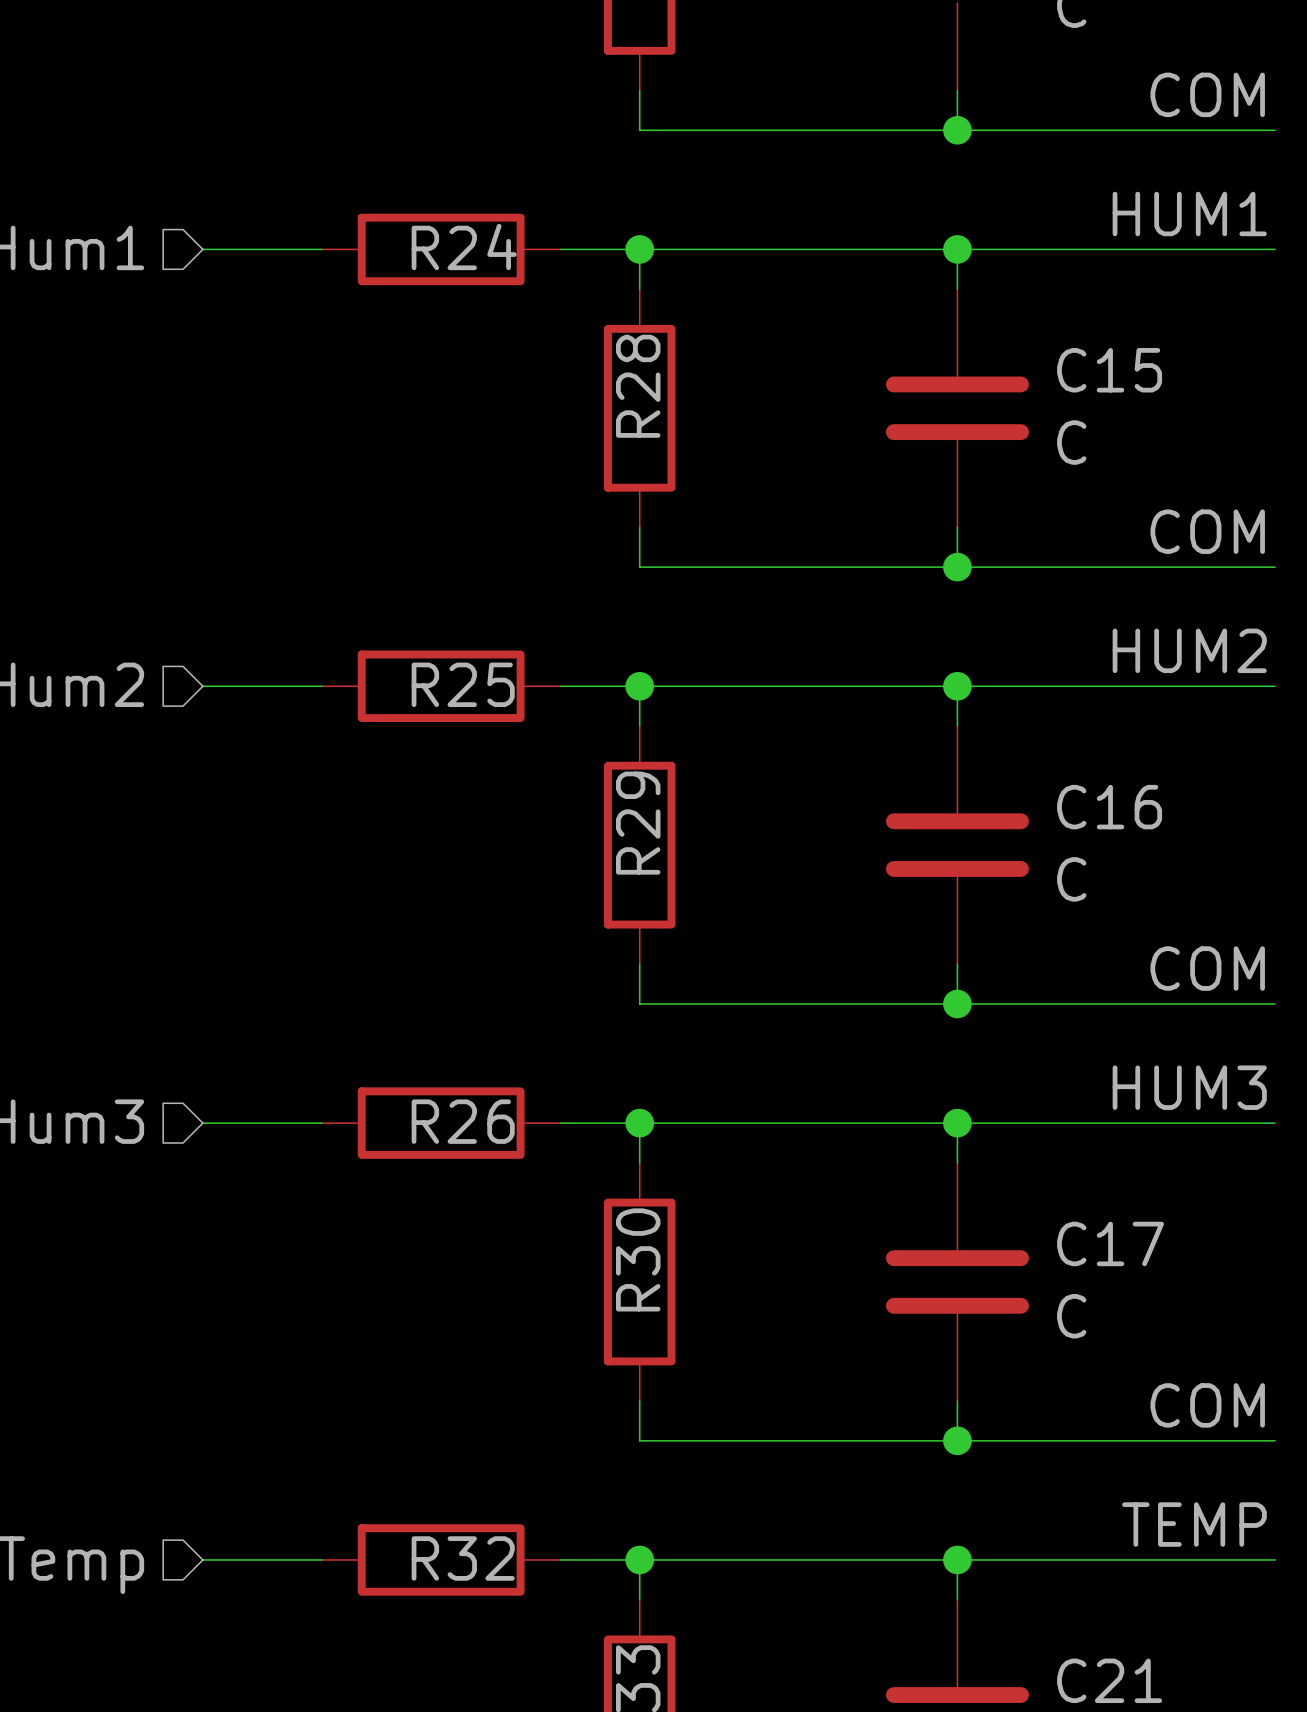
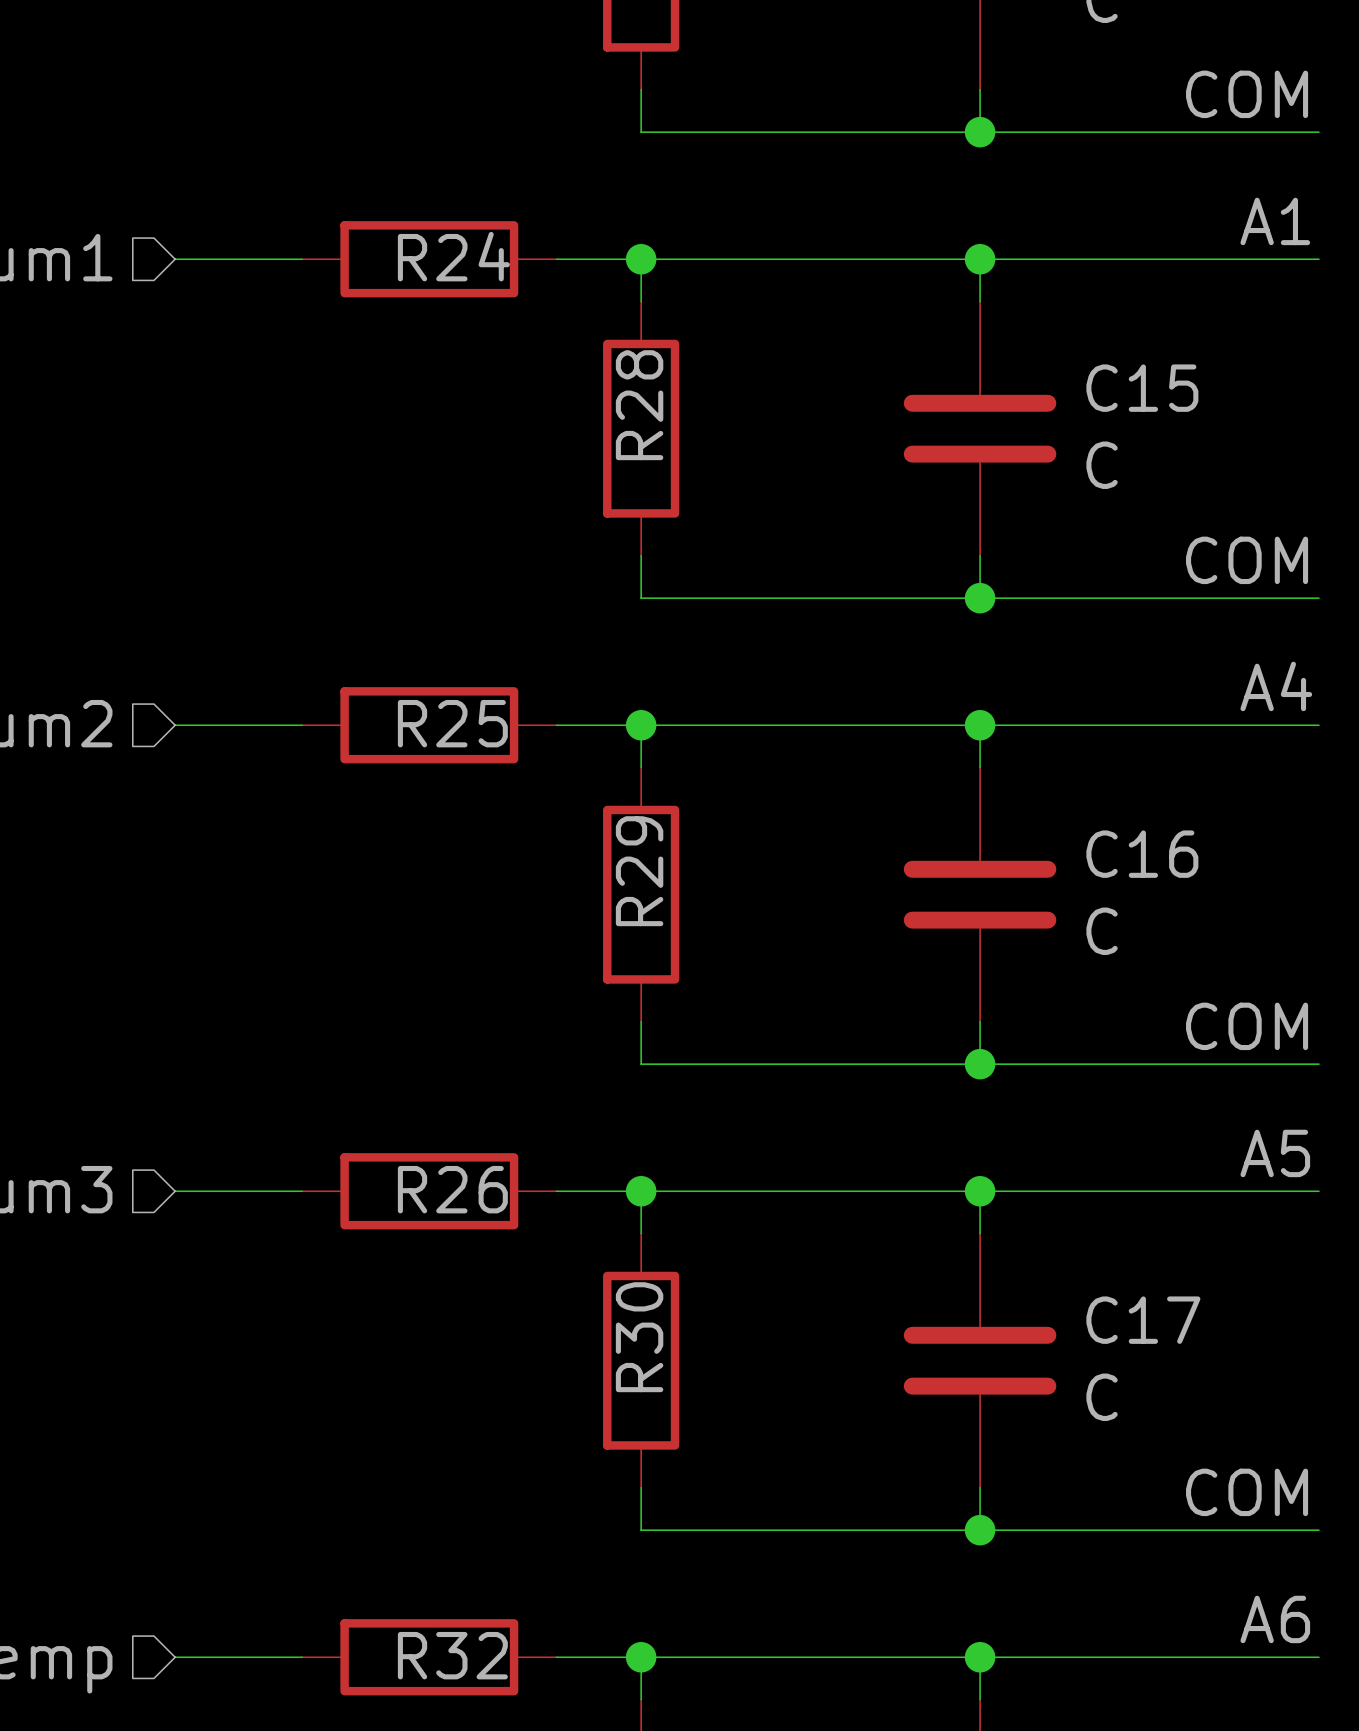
label: HUM1 (1189, 213) -> A1 (1275, 221)
label: HUM2 (1189, 650) -> A4 (1276, 686)
label: HUM3 (1189, 1087) -> A5 (1275, 1153)
label: TEMP (1194, 1524) -> A6 (1275, 1619)

